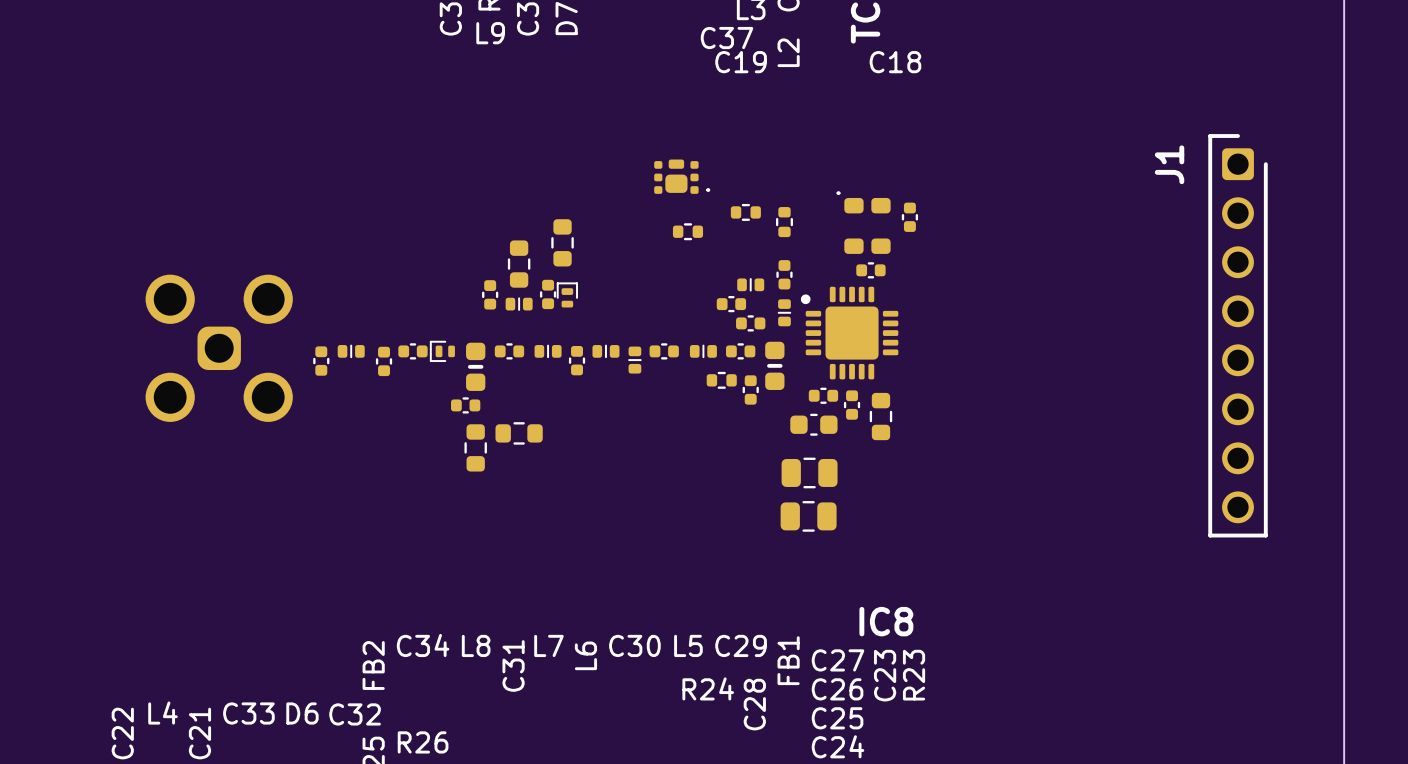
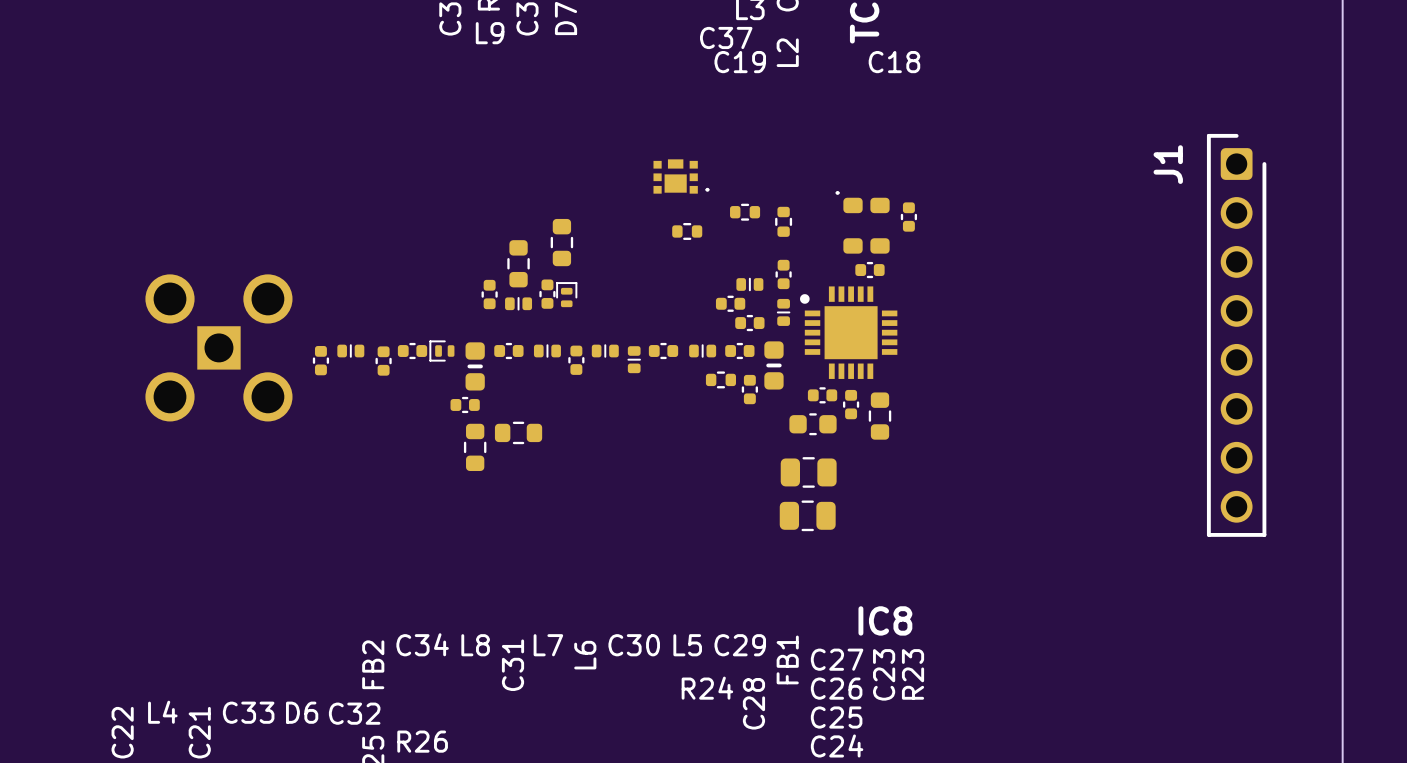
part footprint: [654, 159, 711, 194] -> [653, 159, 710, 194]
part footprint: [145, 274, 293, 422] -> [145, 274, 293, 422]
IC8 footprint: [800, 286, 899, 380] -> [799, 286, 898, 379]

